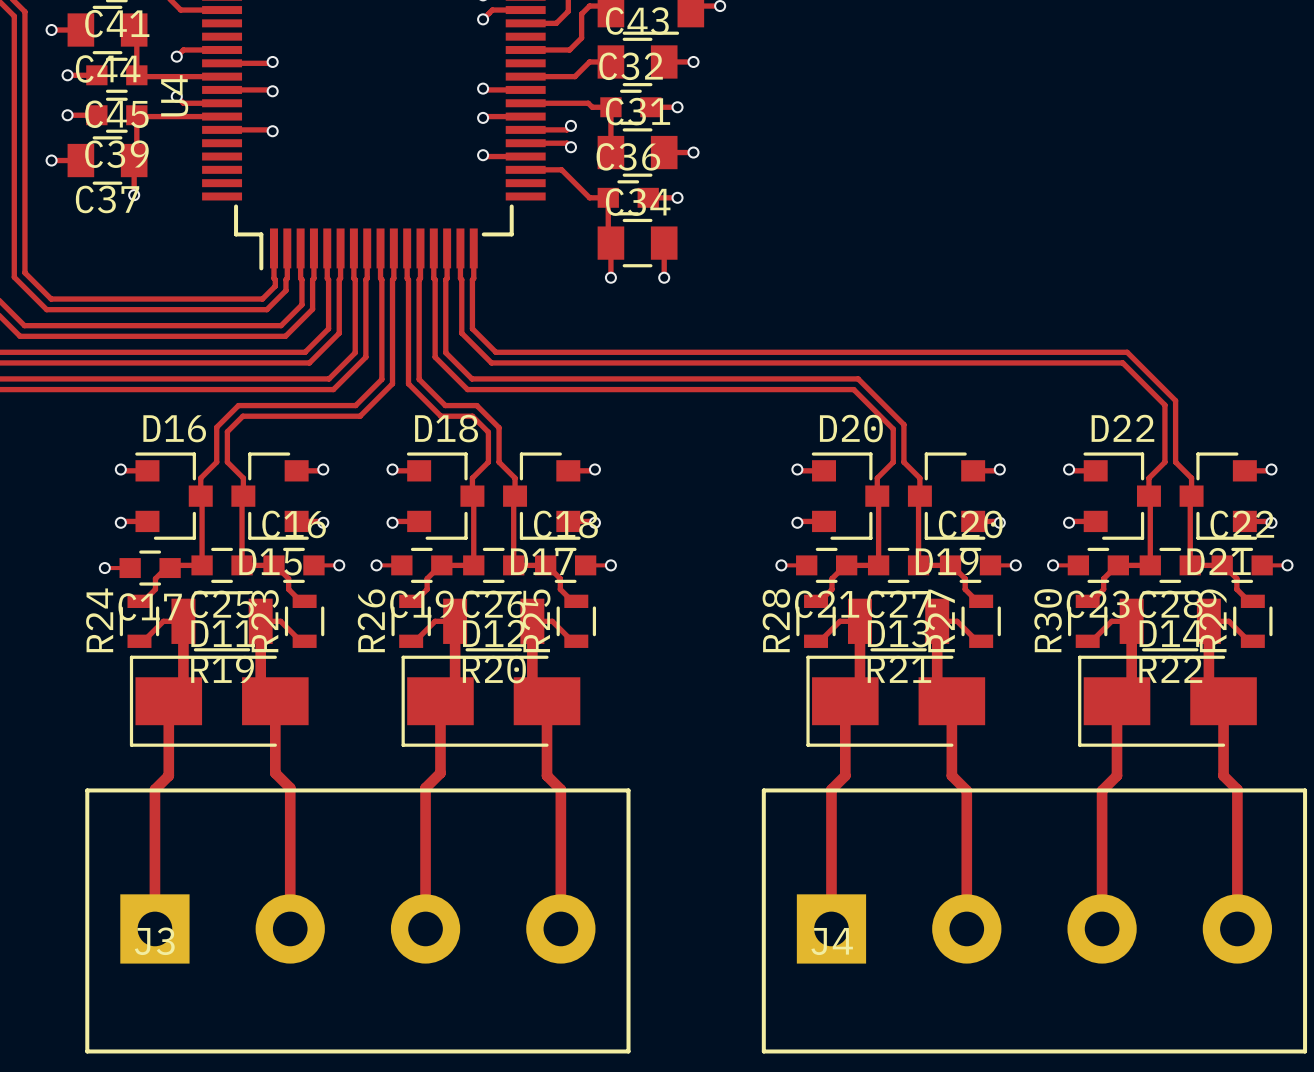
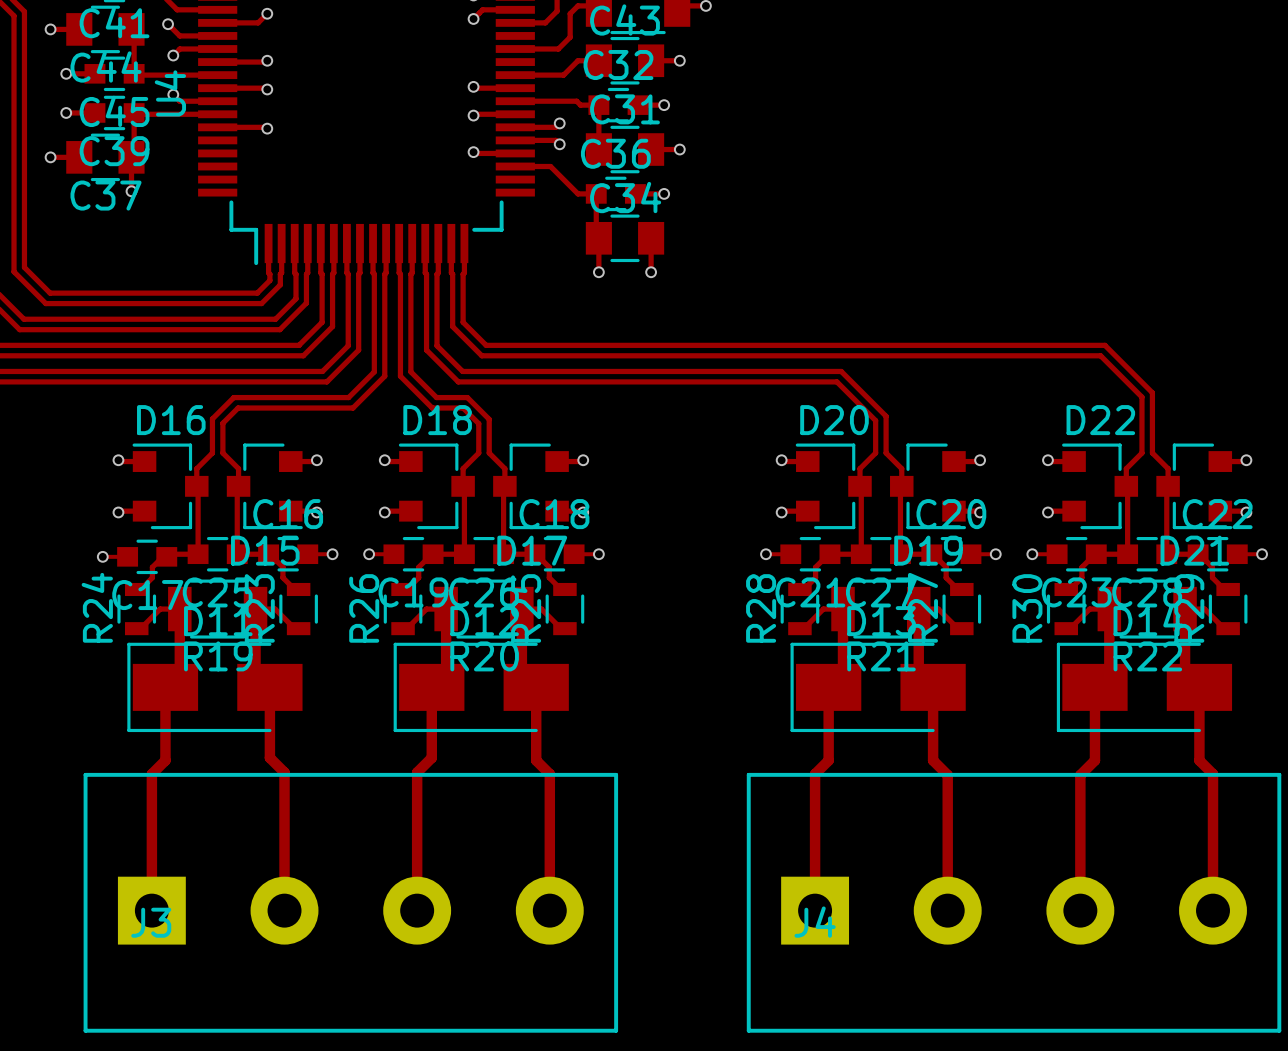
track: none -> (267, 13) (258, 22) (217, 22)
via: none -> (267, 13)
track: none -> (168, 24) (179, 35) (217, 35)
via: none -> (168, 24)

